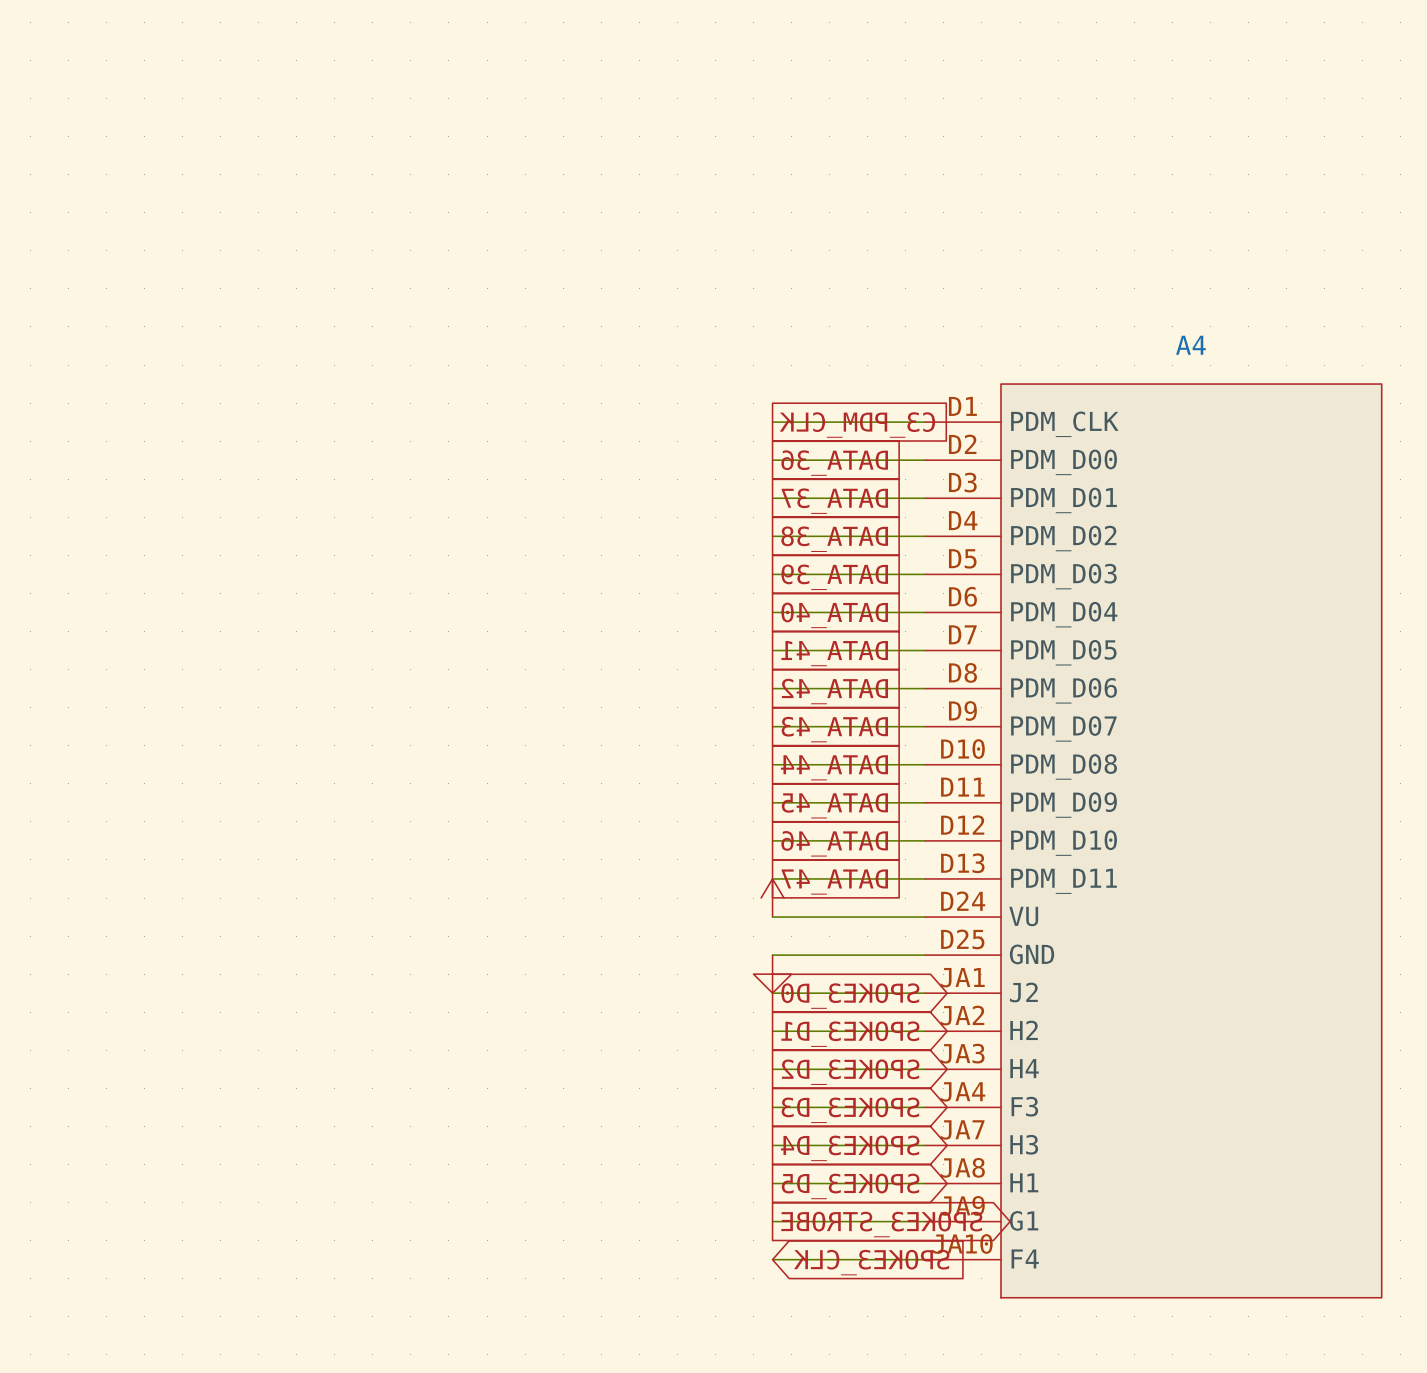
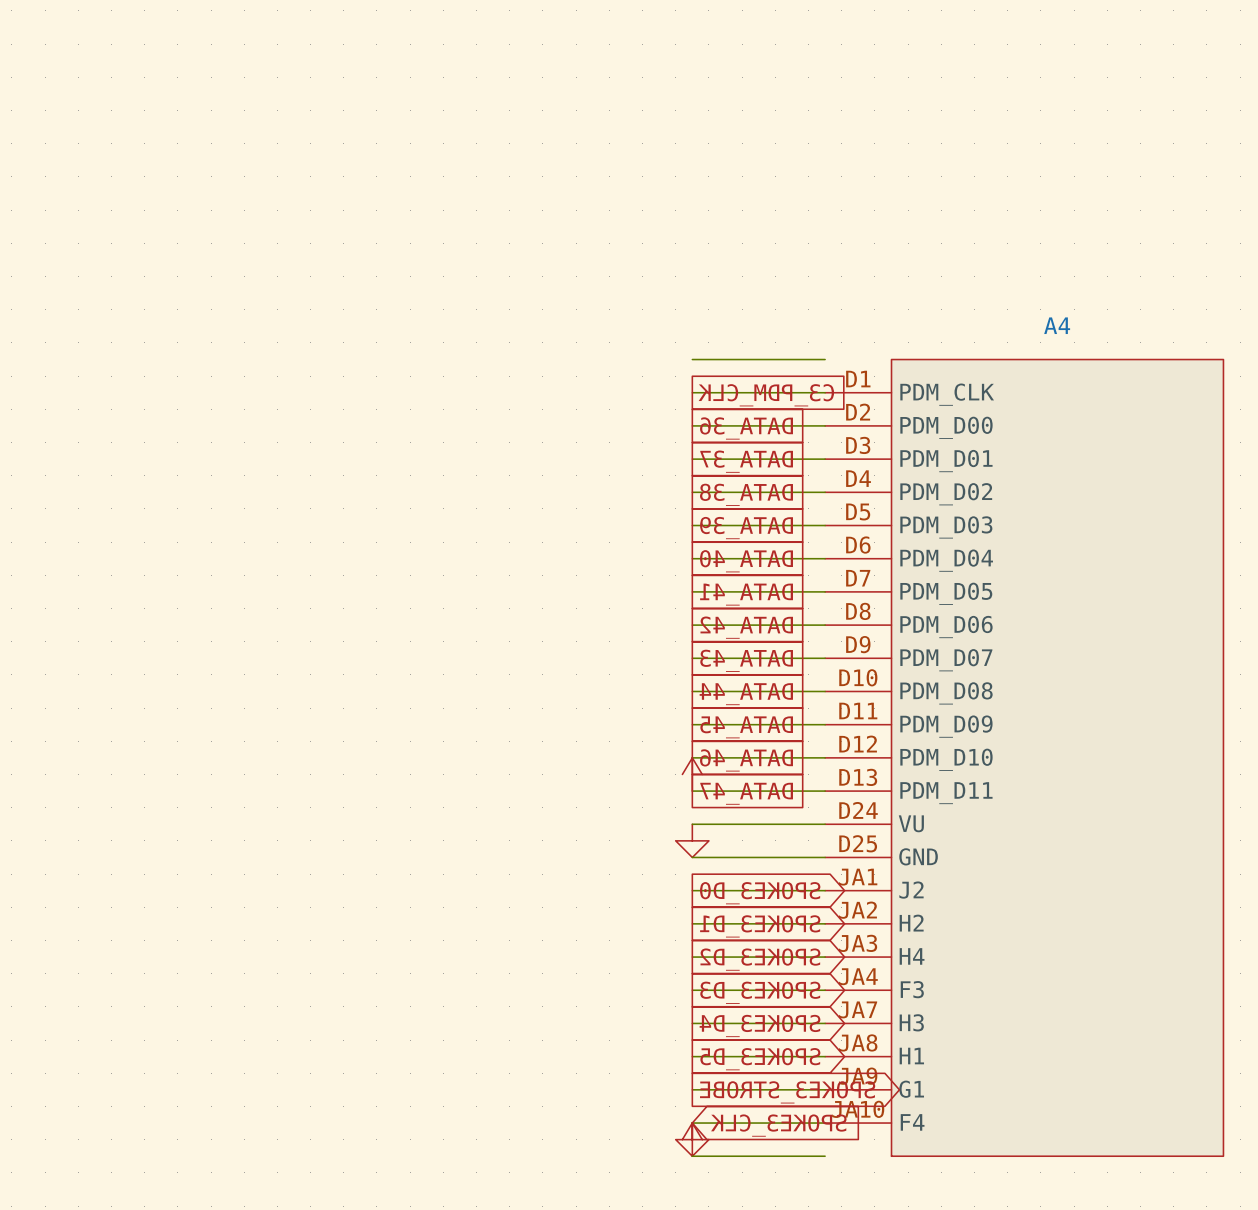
wire: none -> (692, 359) (825, 359)
power symbol position: (772, 898) -> (692, 774)
power symbol position: (772, 974) -> (692, 840)
power symbol: none -> (692, 1139)
power symbol: none -> (692, 1139)
wire: none -> (692, 1156) (825, 1156)

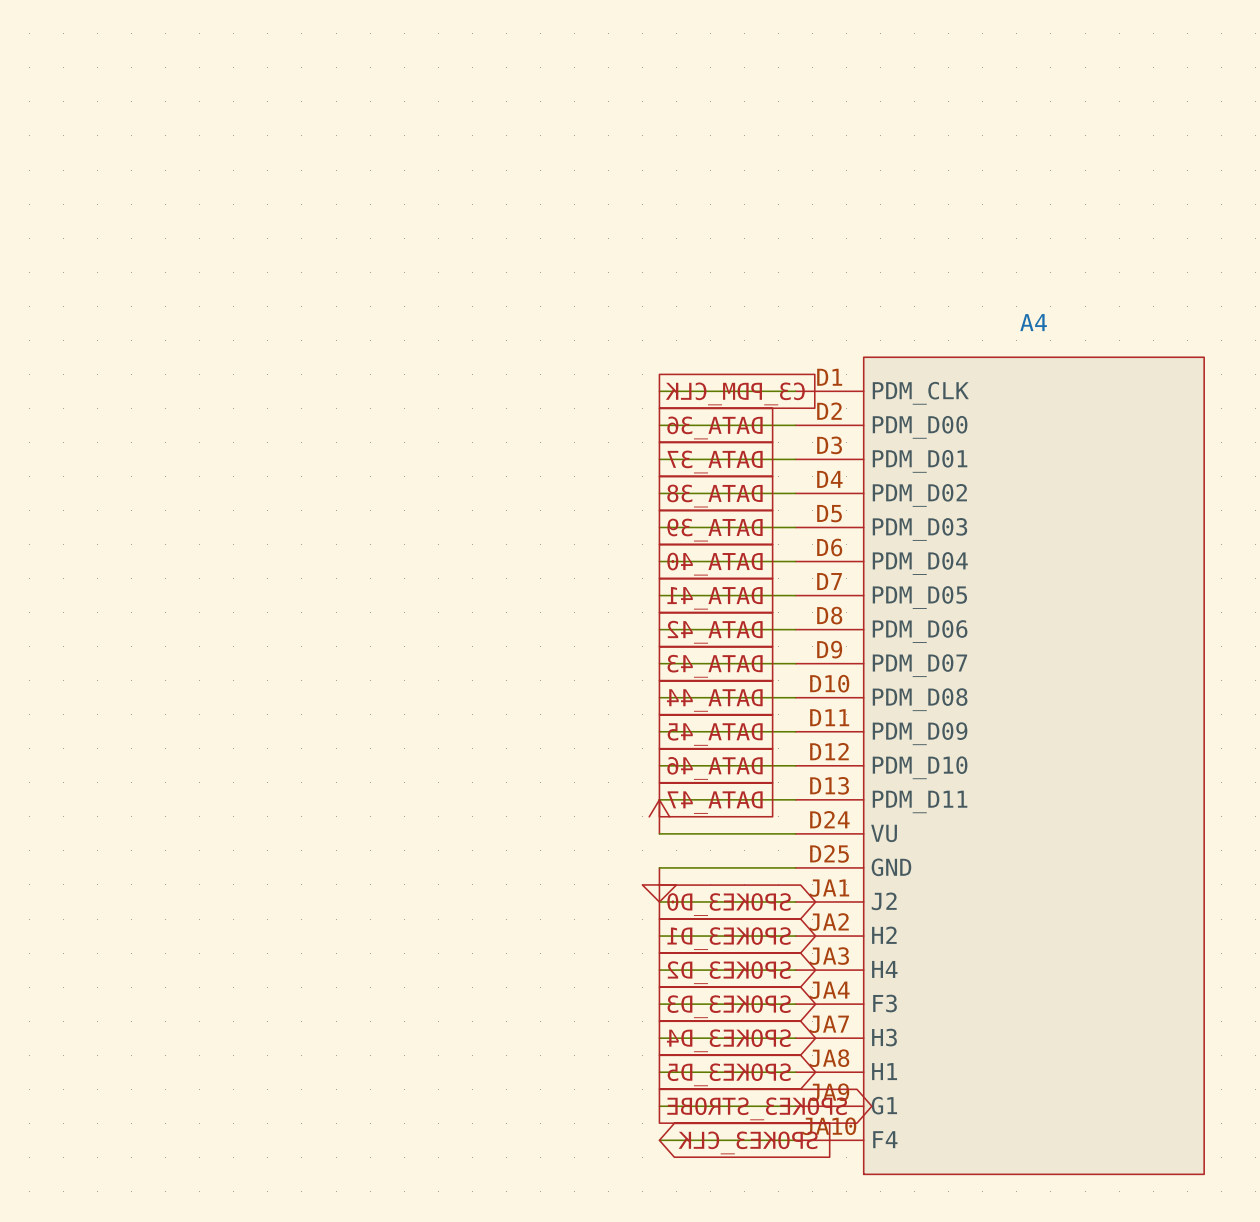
wire: (692, 359) (825, 359) -> none
power symbol position: (692, 774) -> (659, 816)
power symbol position: (692, 840) -> (659, 884)
power symbol: (692, 1139) -> none
power symbol: (692, 1139) -> none
wire: (692, 1156) (825, 1156) -> none

